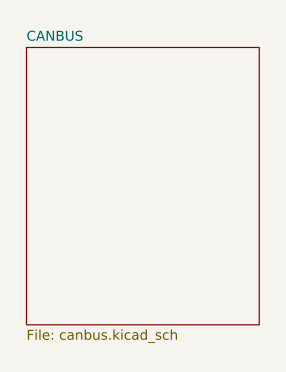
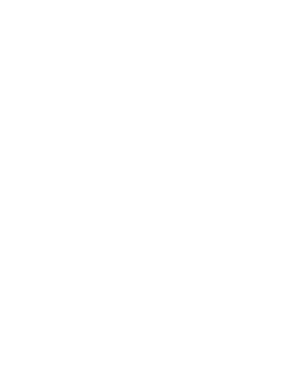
sheet CANBUS: File: canbus.kicad_sch (142, 186) -> none

